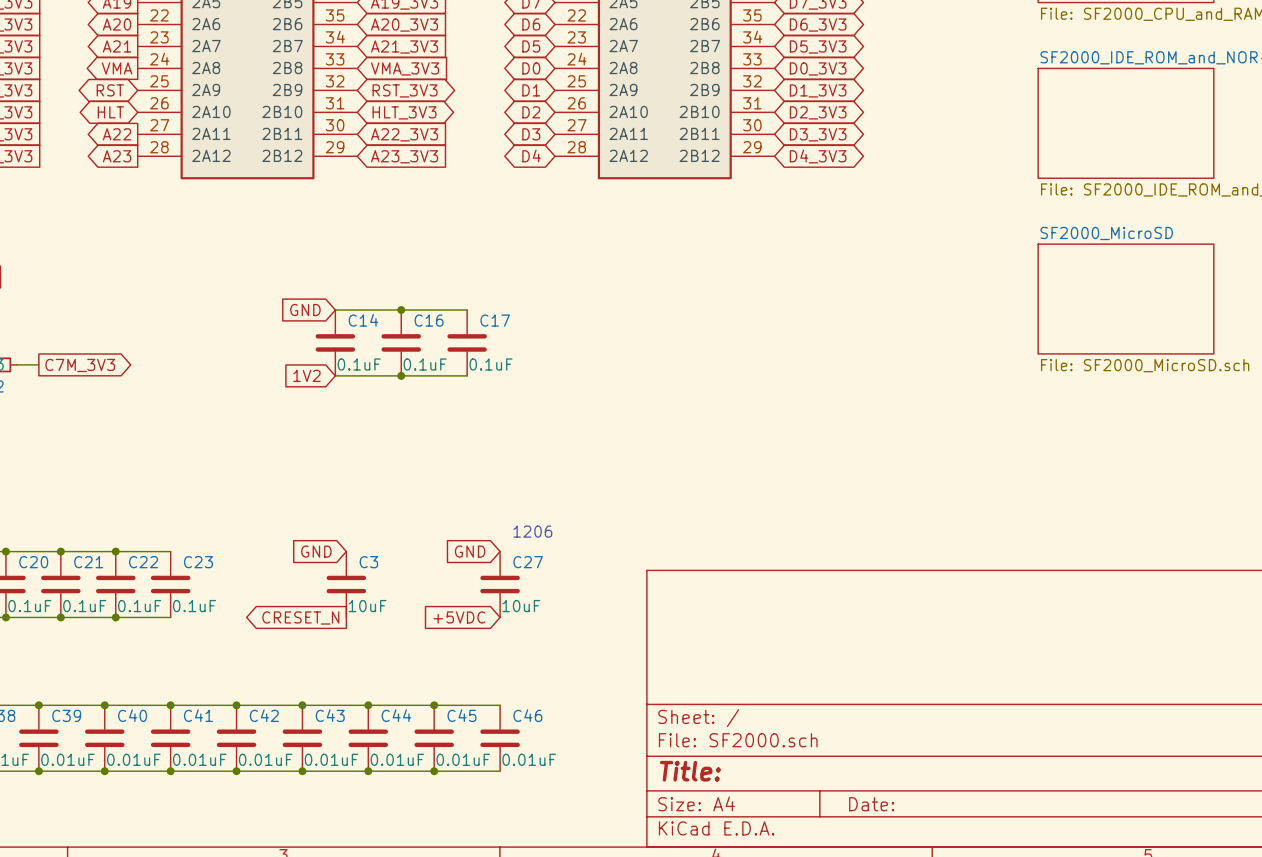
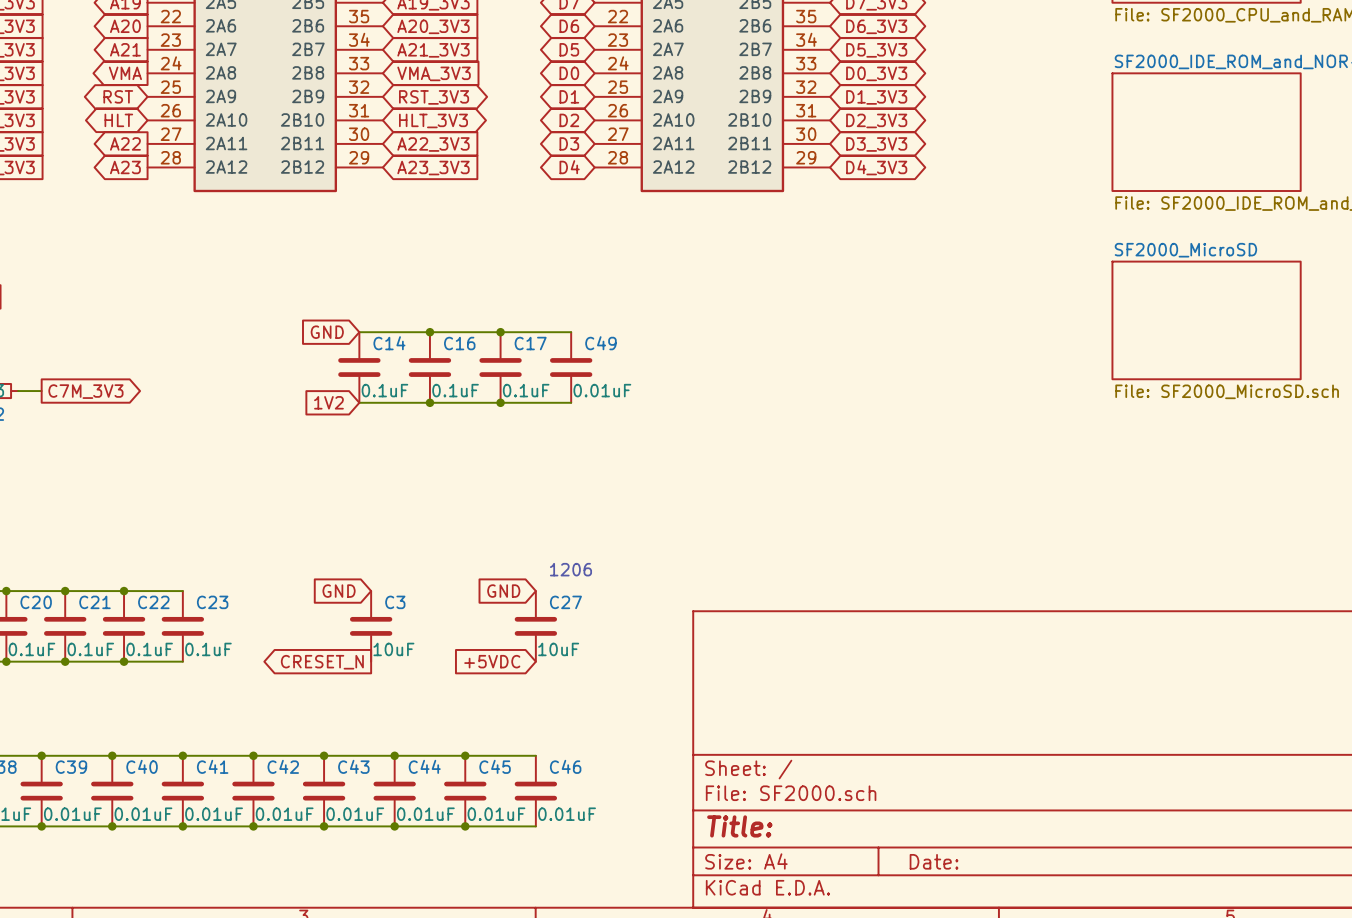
wire: none -> (500, 332) (571, 332)
junction: none -> (500, 332)
C49: none -> 0.01uF (571, 367)
wire: none -> (500, 402) (571, 402)
junction: none -> (500, 402)

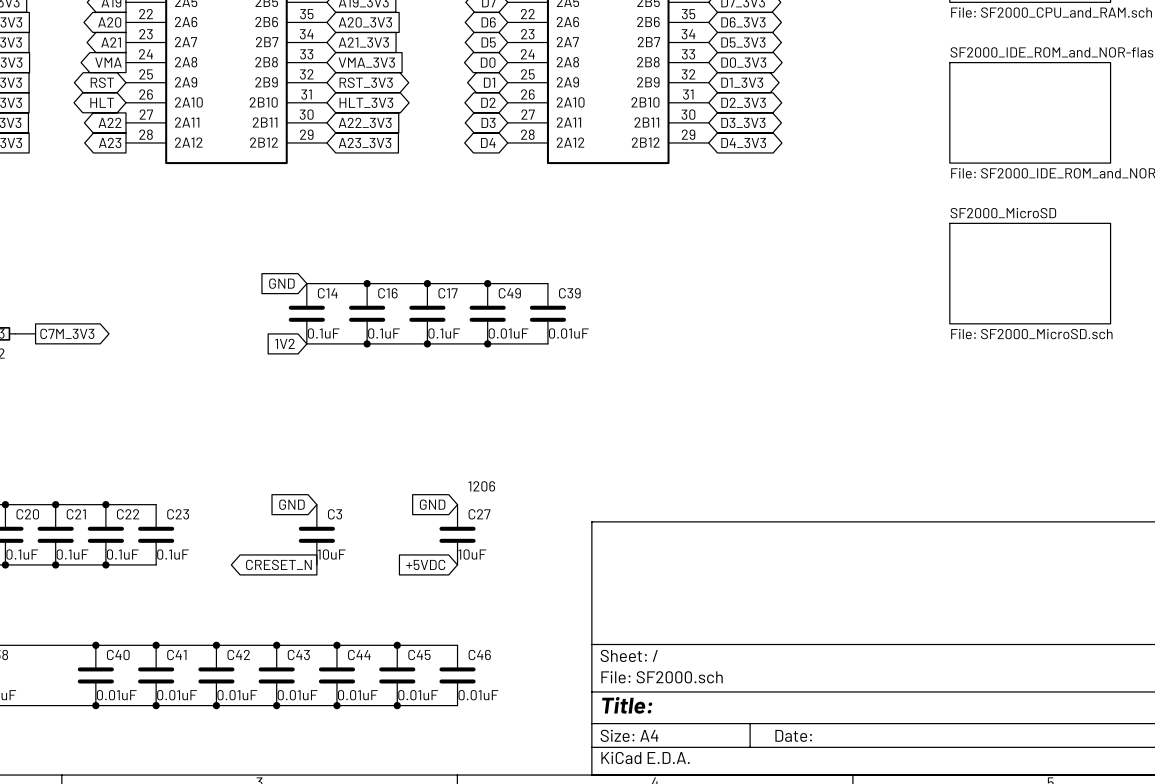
wire: none -> (487, 283) (547, 283)
junction: none -> (487, 283)
wire: none -> (487, 343) (547, 343)
junction: none -> (487, 343)
junction: (41, 755) -> none
C39 position: (41, 791) -> (547, 313)
junction: (41, 826) -> none

